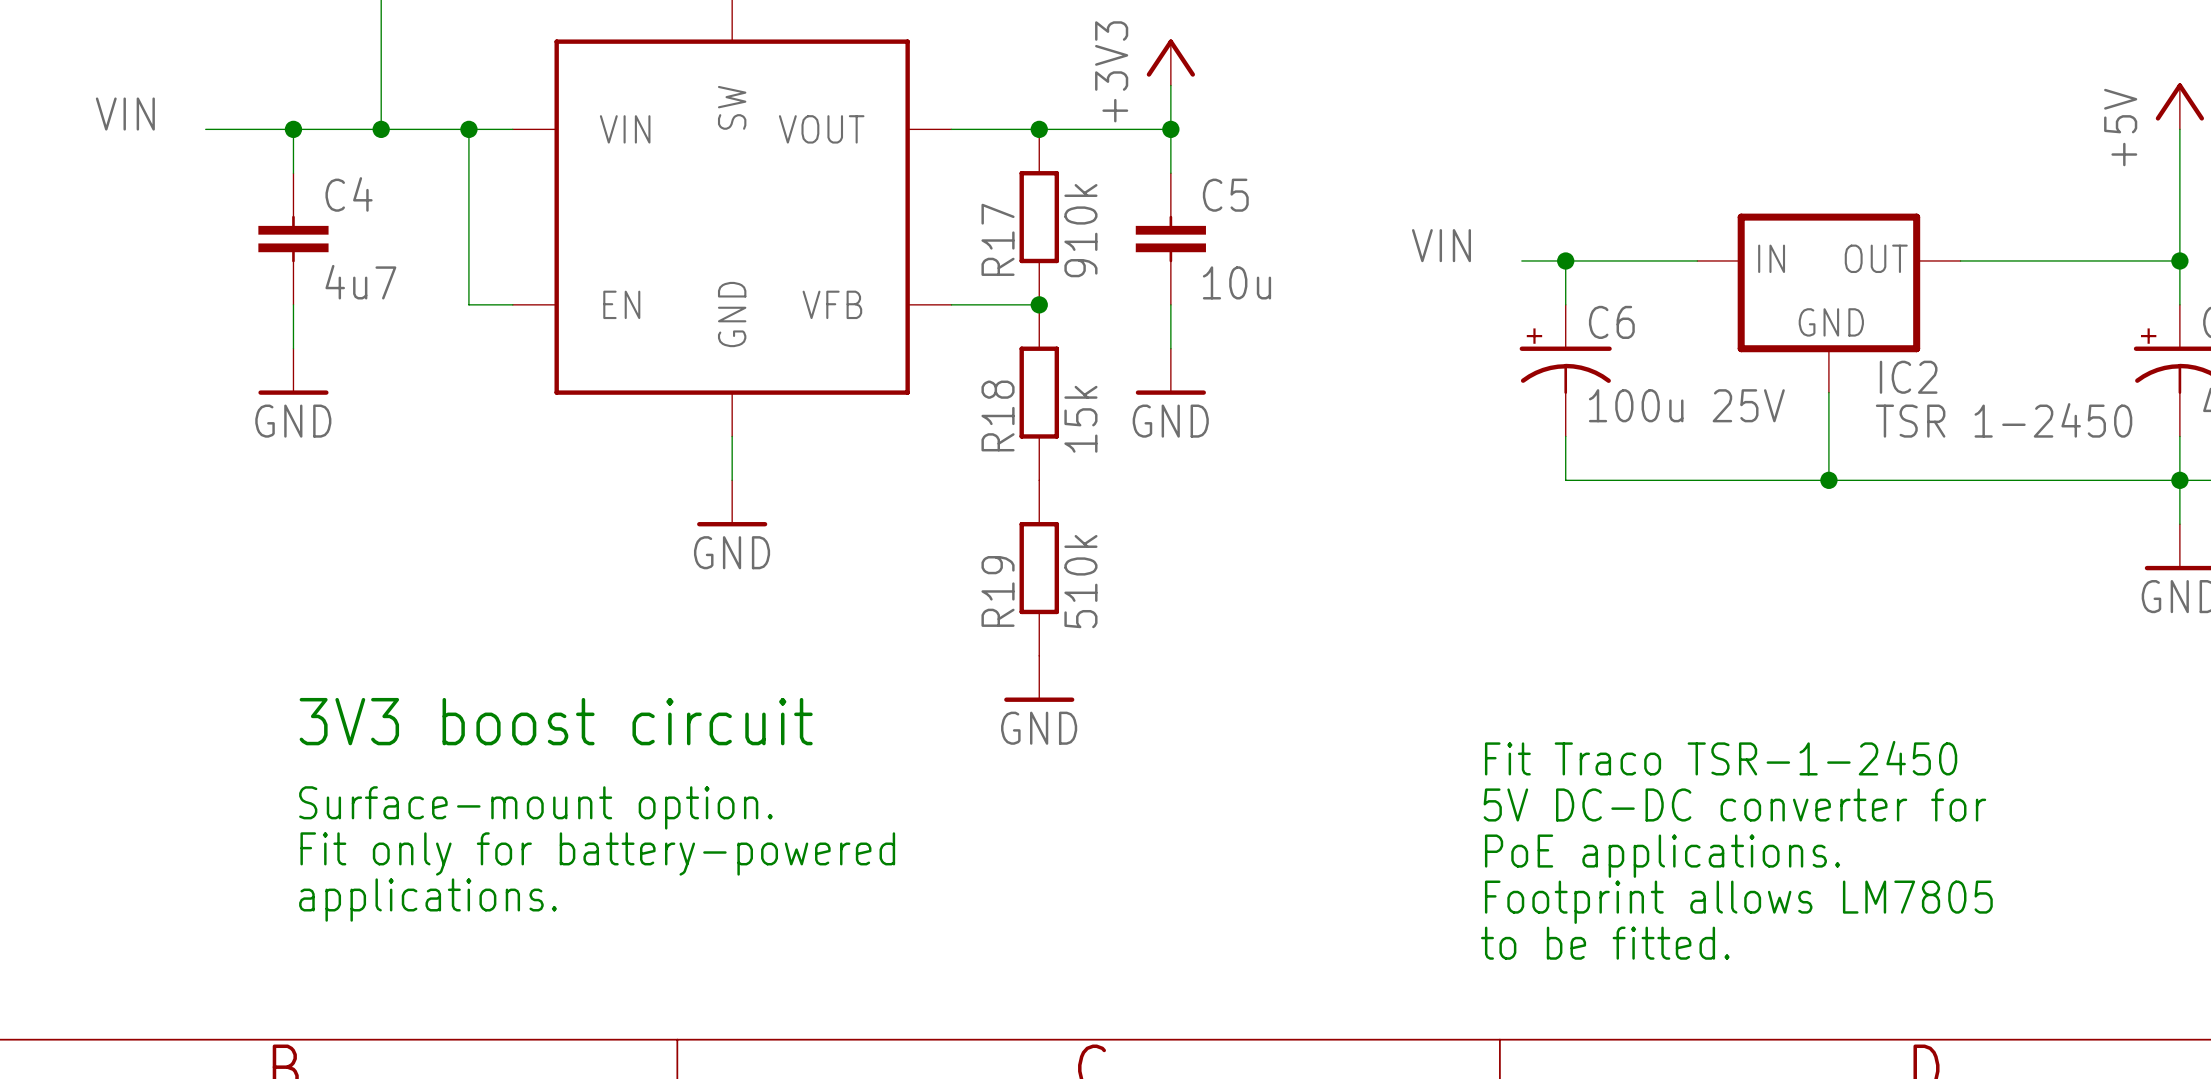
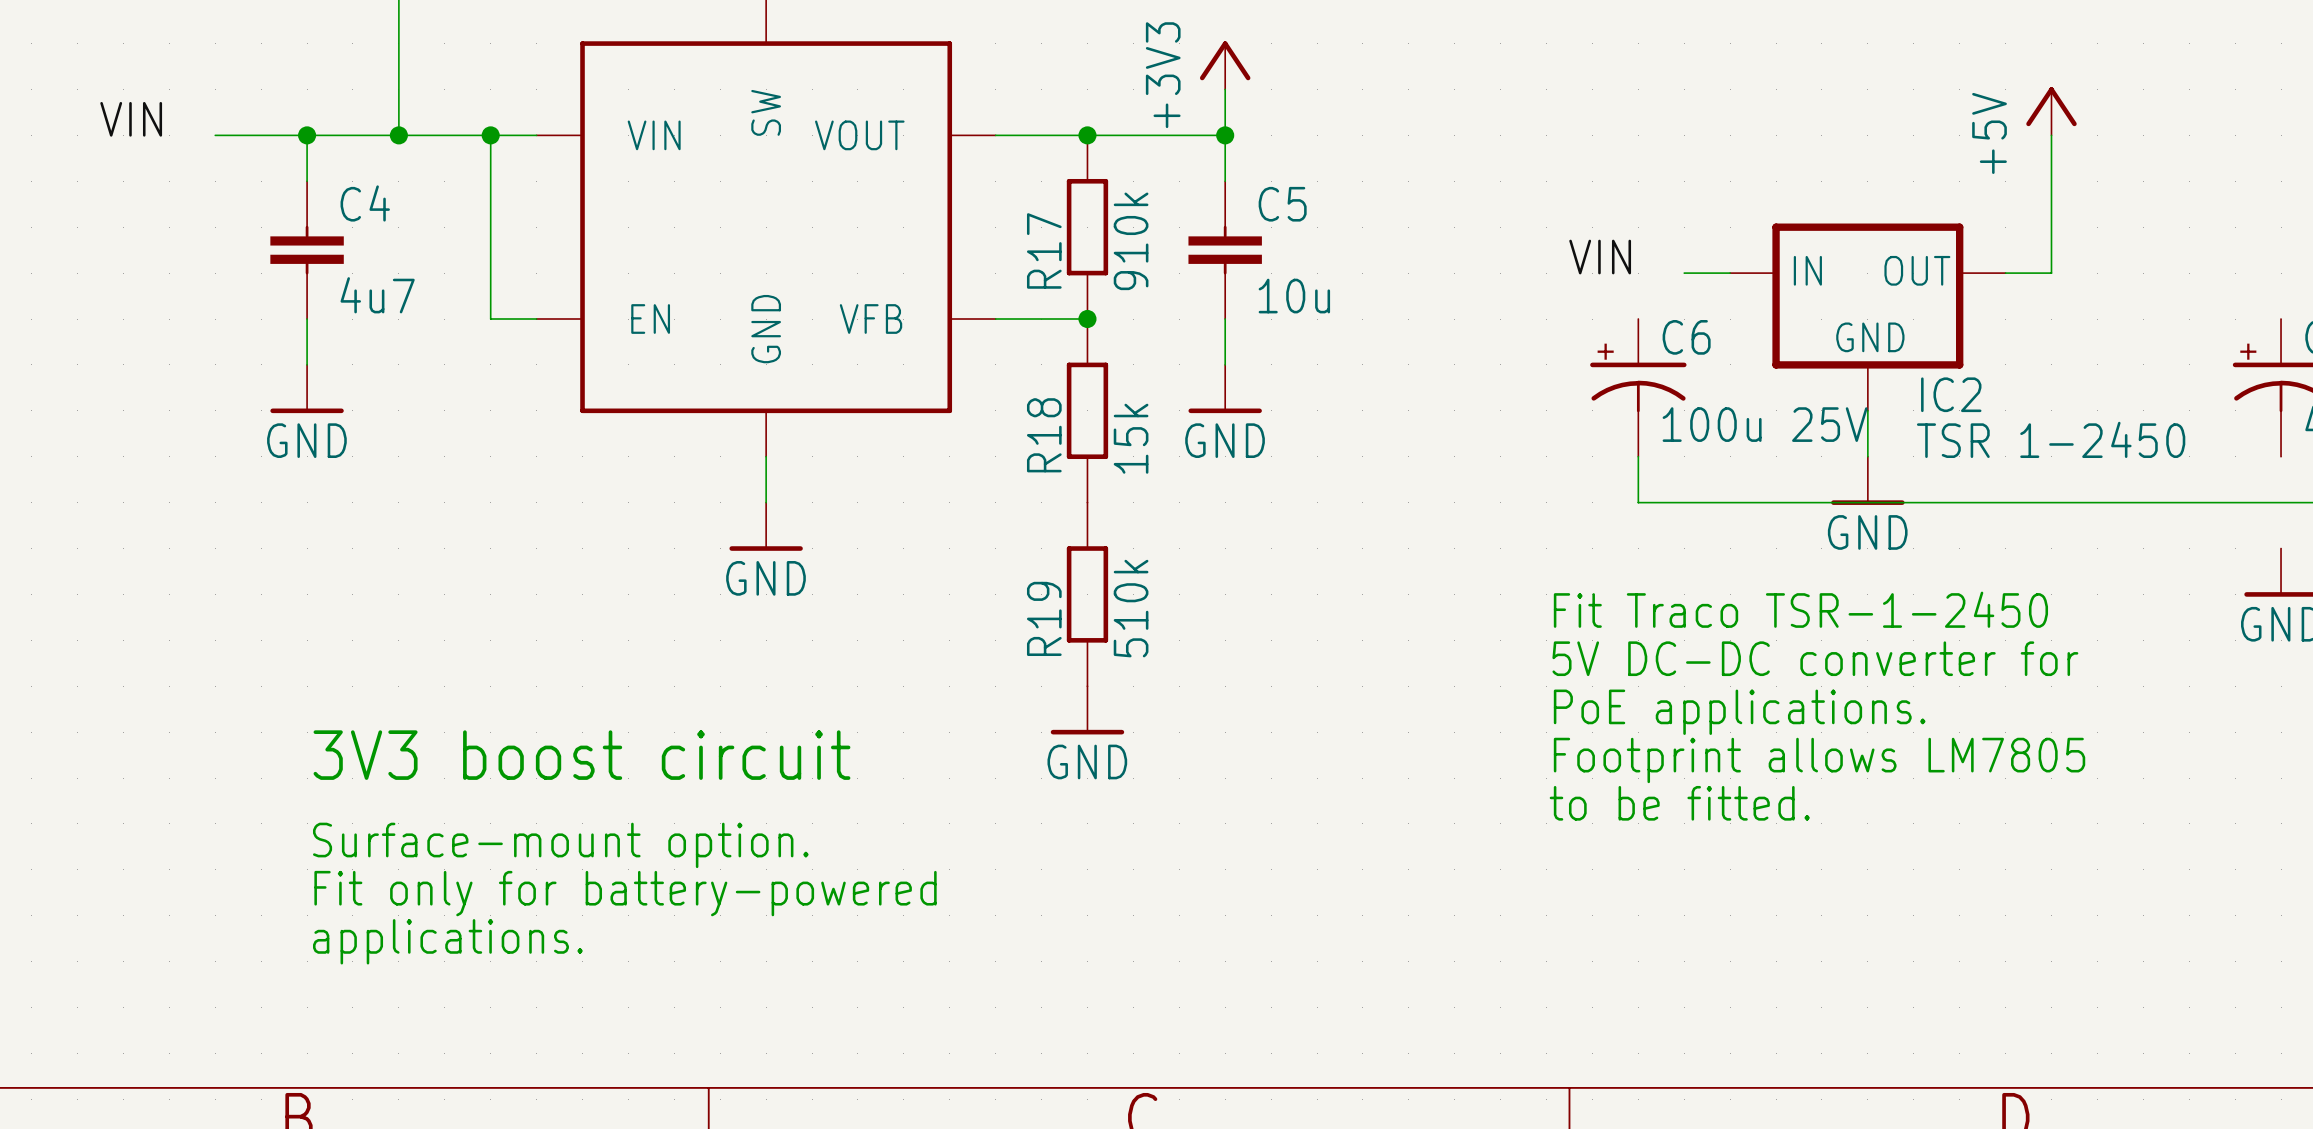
power symbol position: +5V (2179, 106) -> +5V (2051, 111)
wire: none -> (2051, 135) (2051, 273) (2005, 273)
wire: (2179, 129) (2179, 304) -> none
label position: VIN (1441, 245) -> VIN (1600, 257)
wire: (1521, 260) (1609, 260) -> none
wire: (1565, 260) (1565, 304) -> (1867, 410) (1867, 456)
junction: (1565, 260) -> none
wire: (1960, 260) (2179, 260) -> none
junction: (2179, 260) -> none
IC2 position: (1828, 303) -> (1867, 317)
wire: (1828, 392) (1828, 480) -> none
wire: (2179, 436) (2179, 524) -> none
power symbol: none -> GND (1867, 480)
junction: (1828, 480) -> none
junction: (2179, 480) -> none
text position: Fit Traco TSR-1-2450 (1721, 758) -> Fit Traco TSR-1-2450 (1800, 609)
text position: 5V DC-DC converter for (1734, 804) -> 5V DC-DC converter for (1815, 658)
text position: PoE applications. (1662, 856) -> PoE applications. (1739, 712)
text position: Footprint allows LM7805 (1738, 902) -> Footprint allows LM7805 (1819, 760)
text position: to be fitted. (1605, 943) -> to be fitted. (1679, 803)

